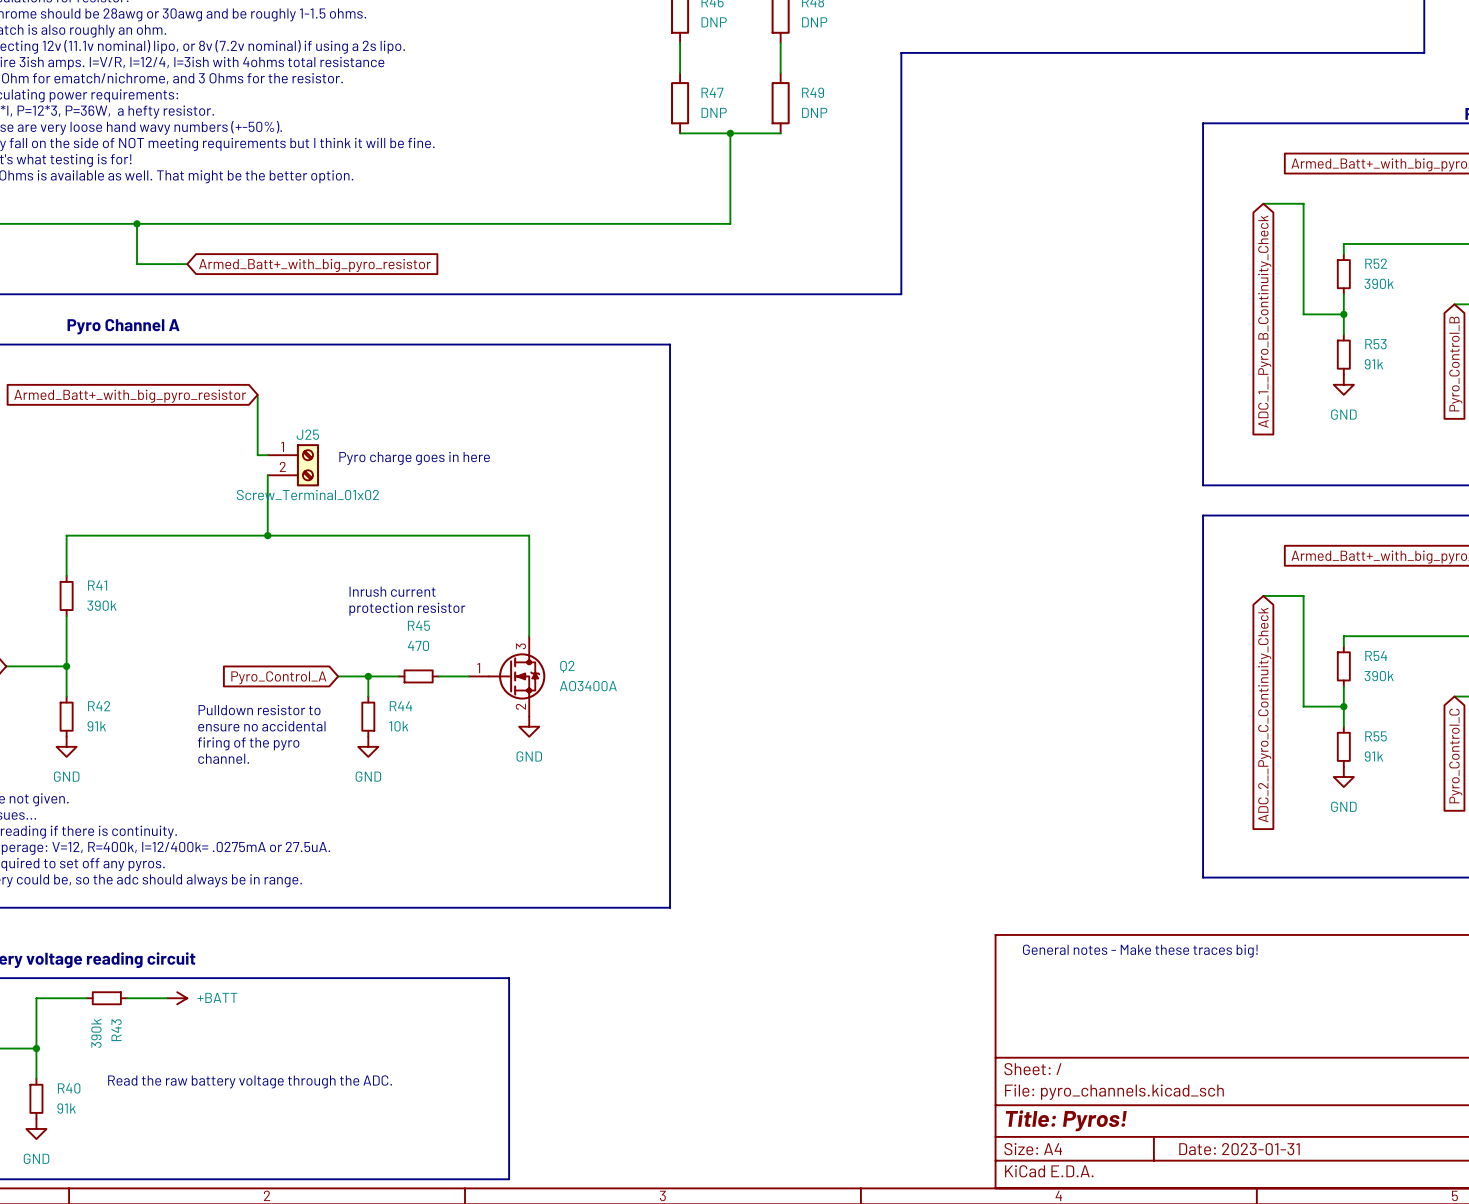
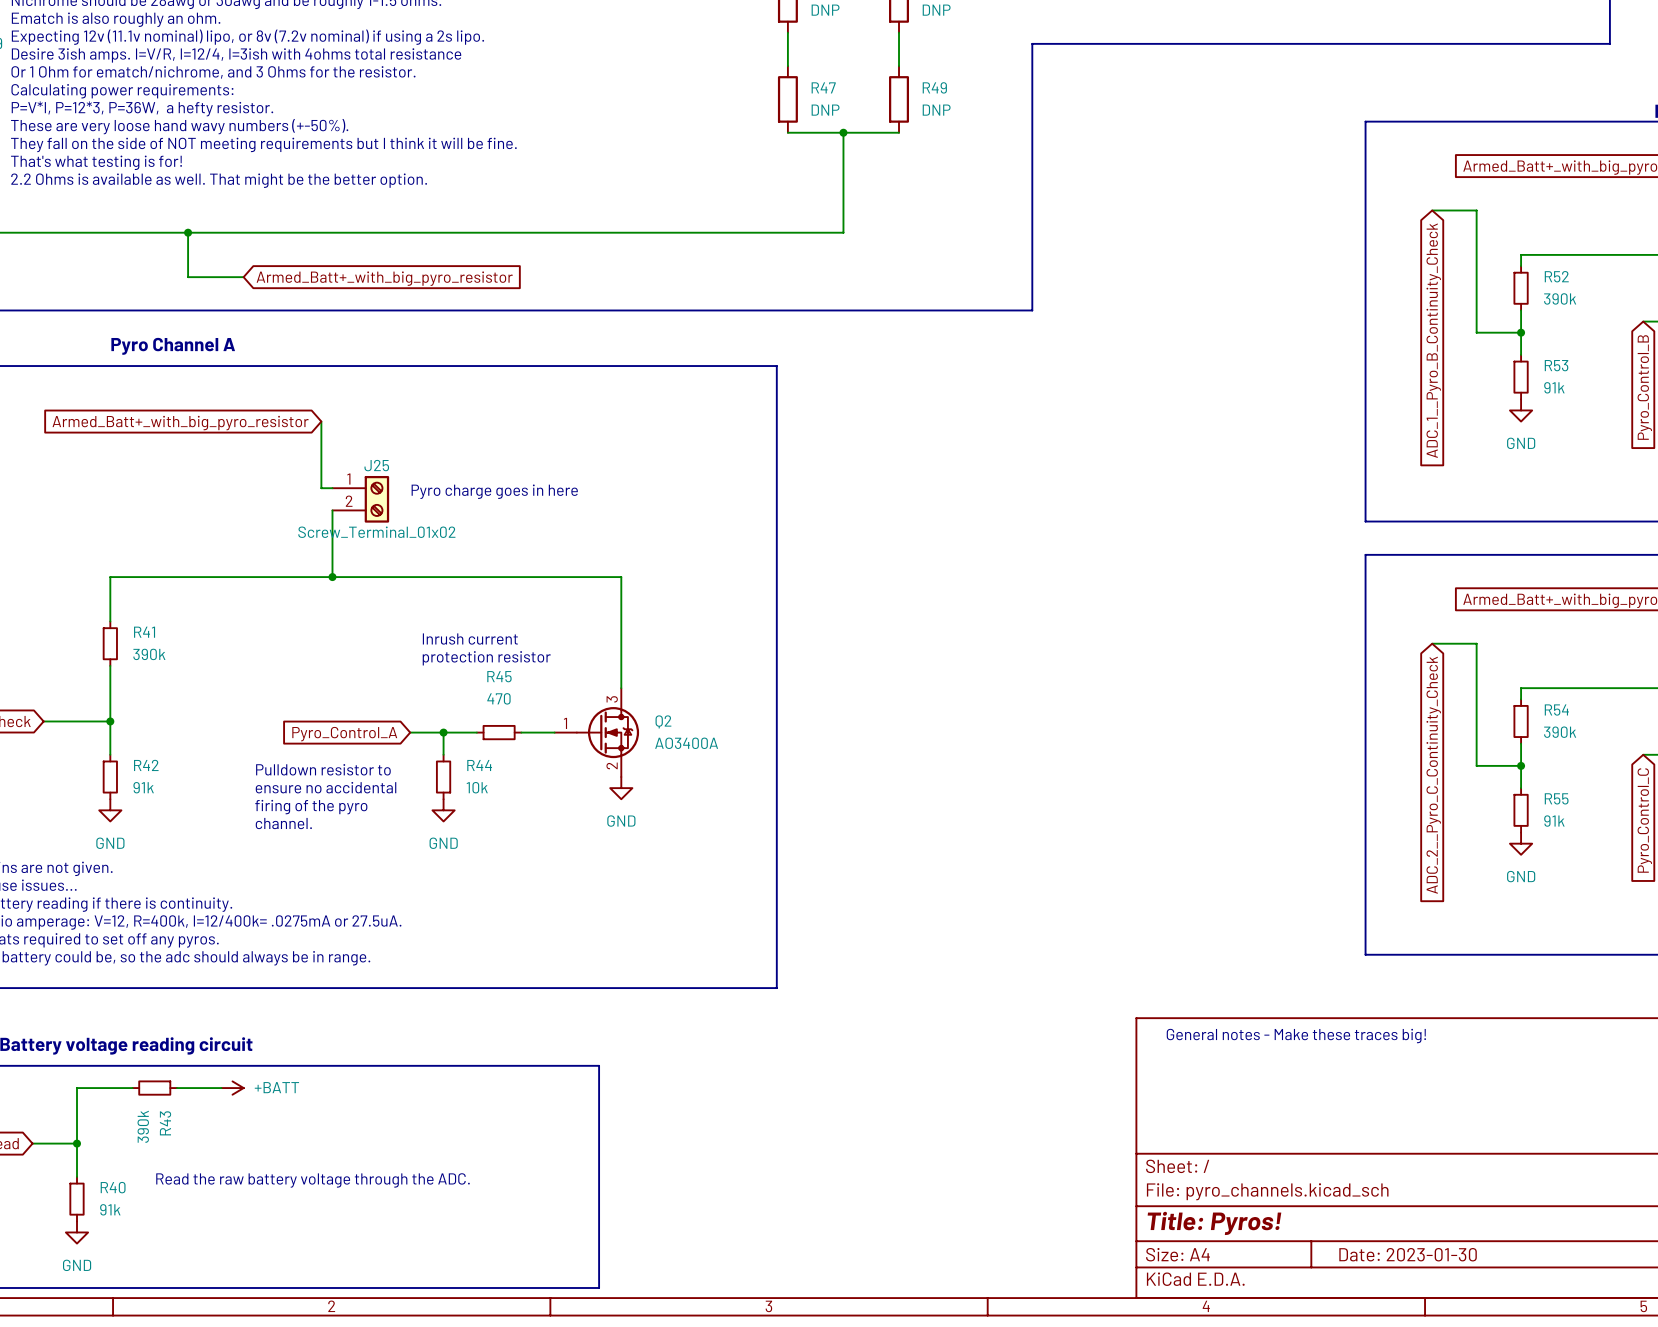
title block: Date: 2023-01-31 (1239, 1149) -> Date: 2023-01-30 (1408, 1254)

